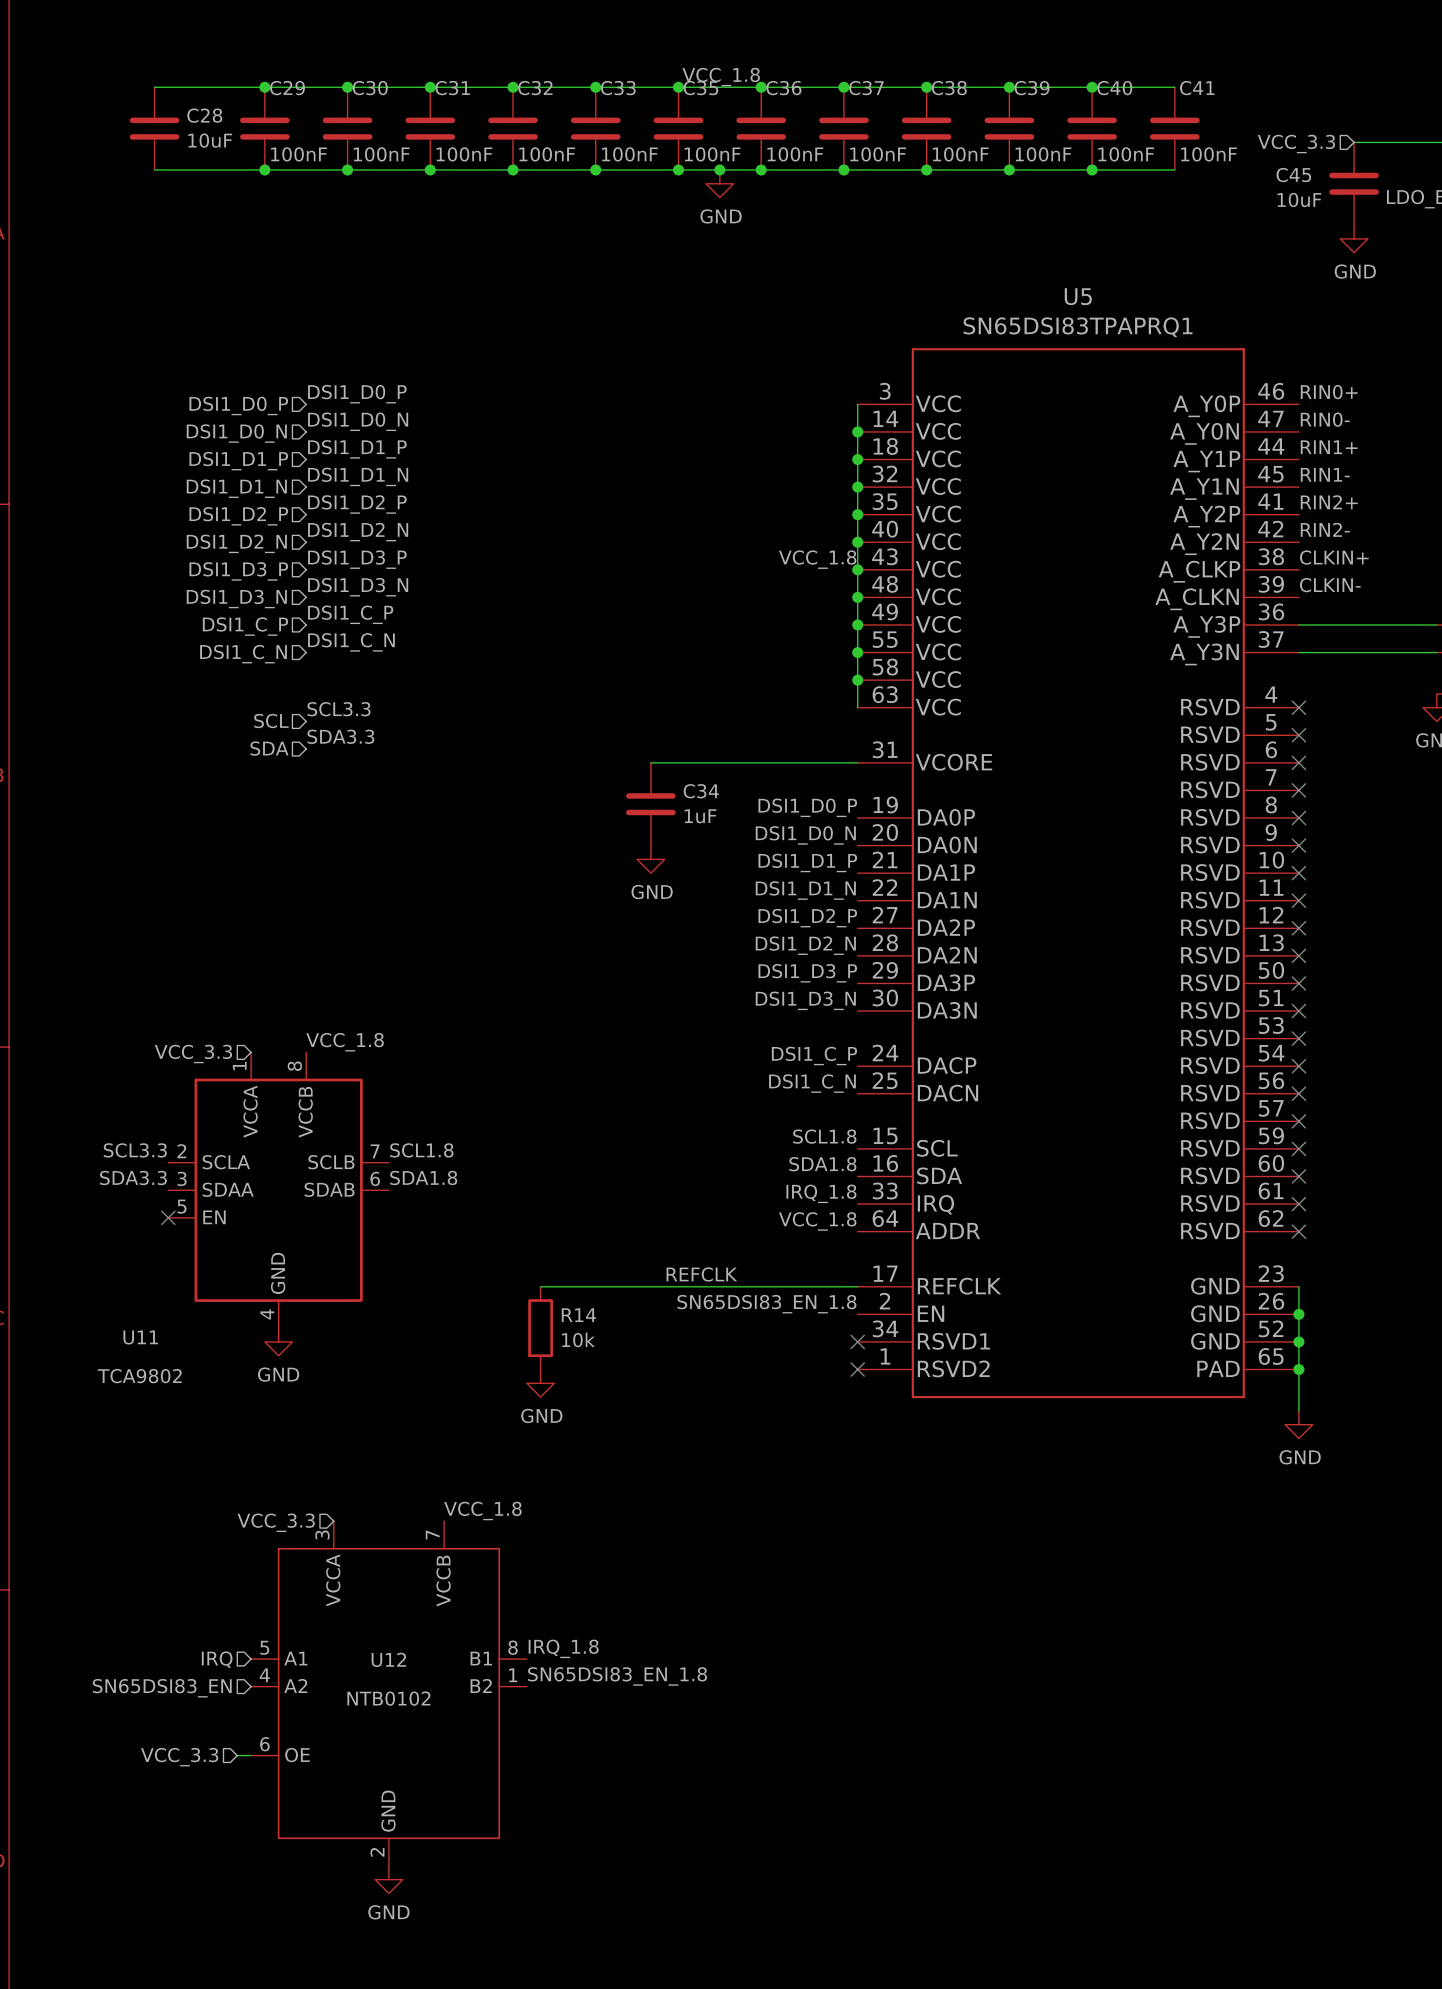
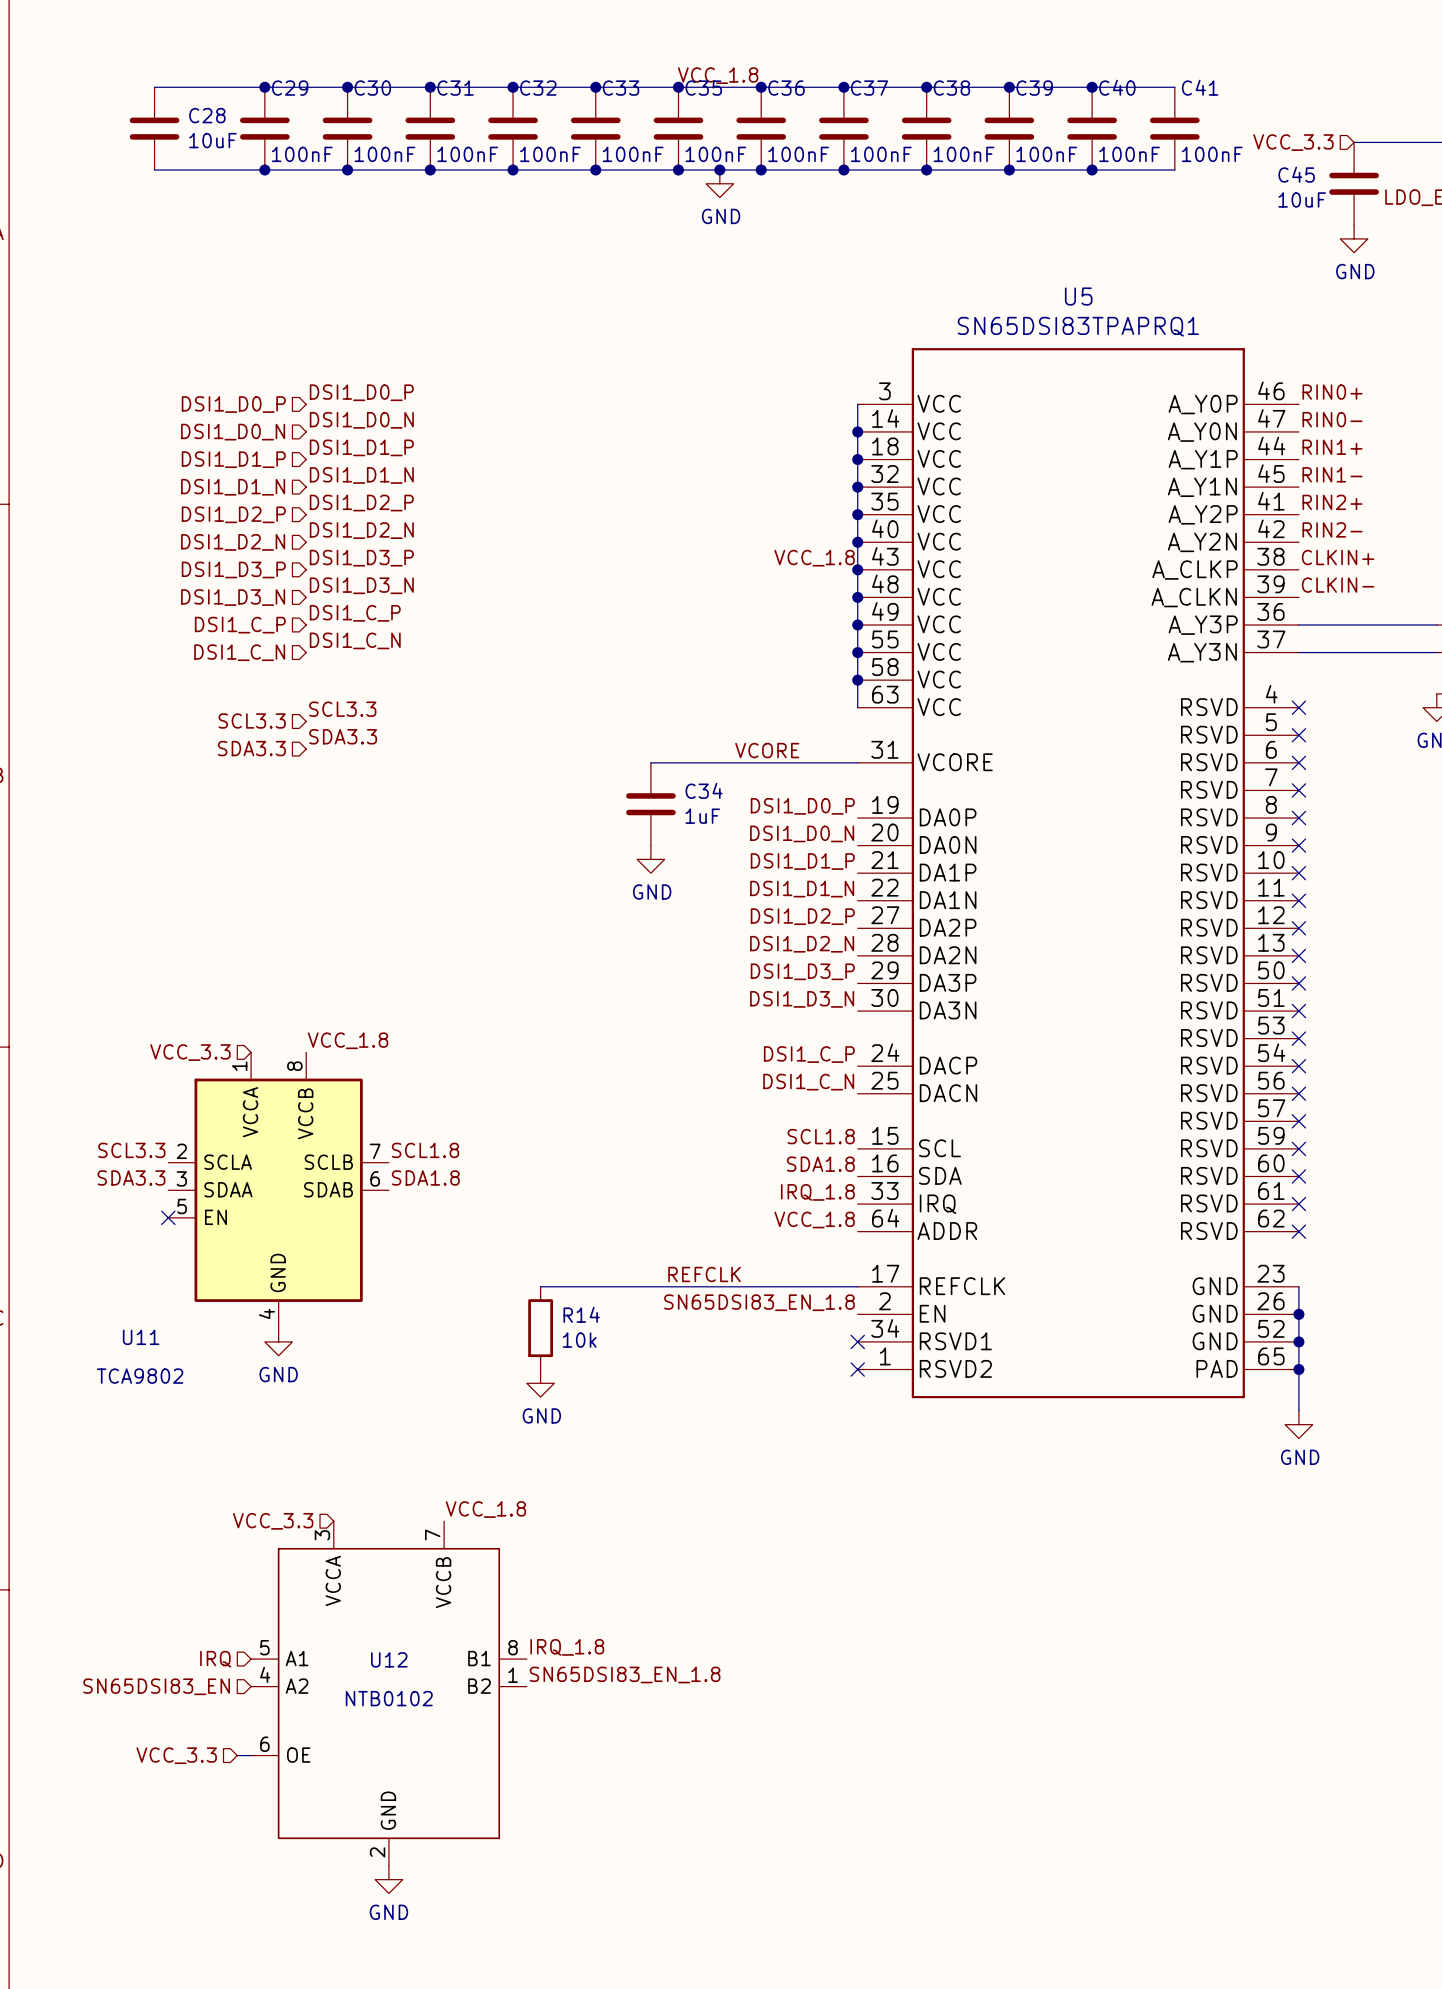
hierarchical label: SCL (271, 720) -> SCL3.3 (252, 720)
hierarchical label: SDA (269, 748) -> SDA3.3 (251, 748)
label: none -> VCORE (767, 750)

